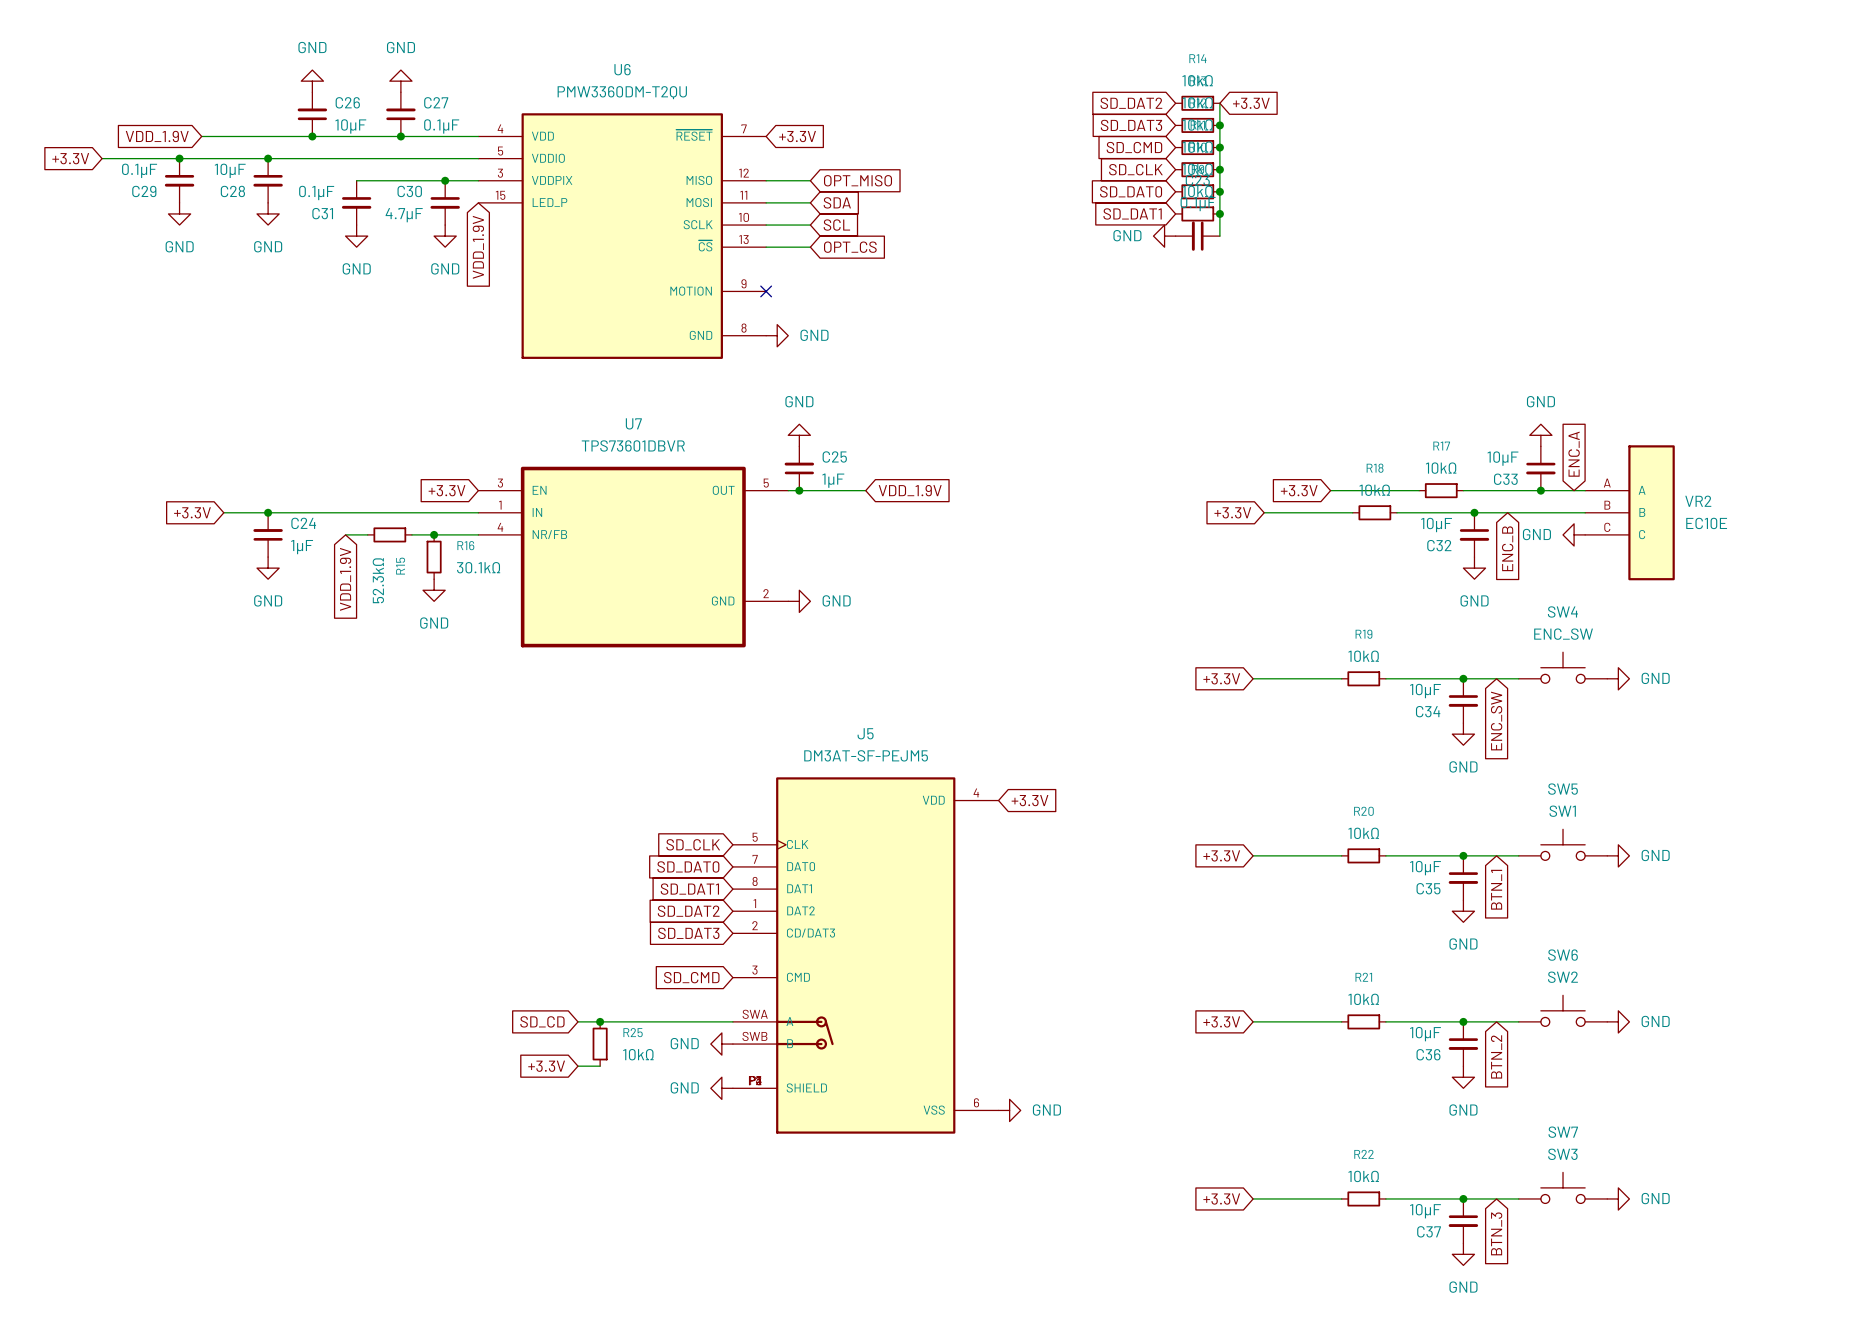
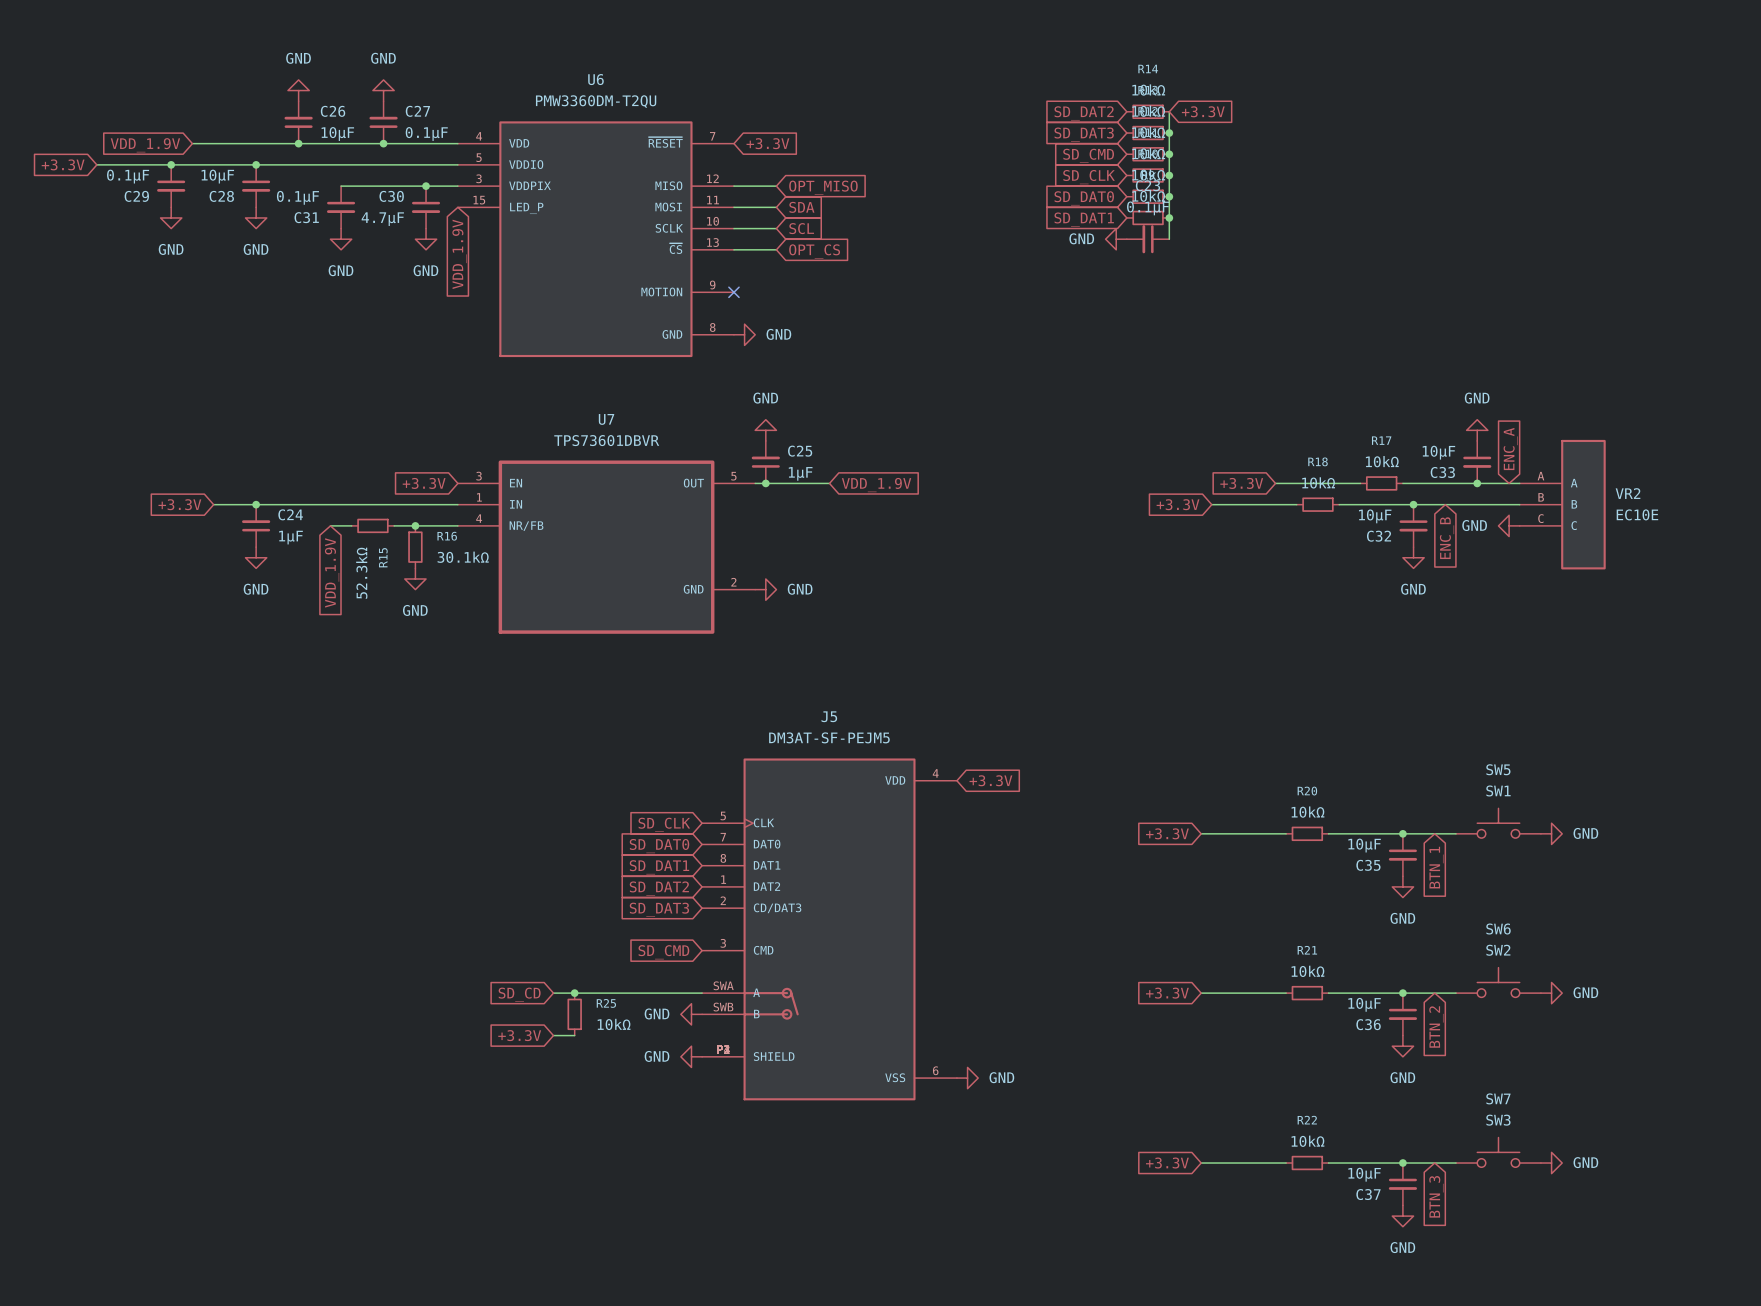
SW4: ENC_SW (1563, 667) -> none
global label: +3.3V (1221, 678) -> none
wire: (1253, 678) (1341, 678) -> none
R19: 10kΩ (1363, 678) -> none
wire: (1385, 678) (1518, 678) -> none
junction: (1463, 678) -> none
power symbol: GND (1618, 678) -> none
C34: 10μF (1463, 700) -> none
global label: ENC_SW (1496, 721) -> none
power symbol: GND (1463, 734) -> none

